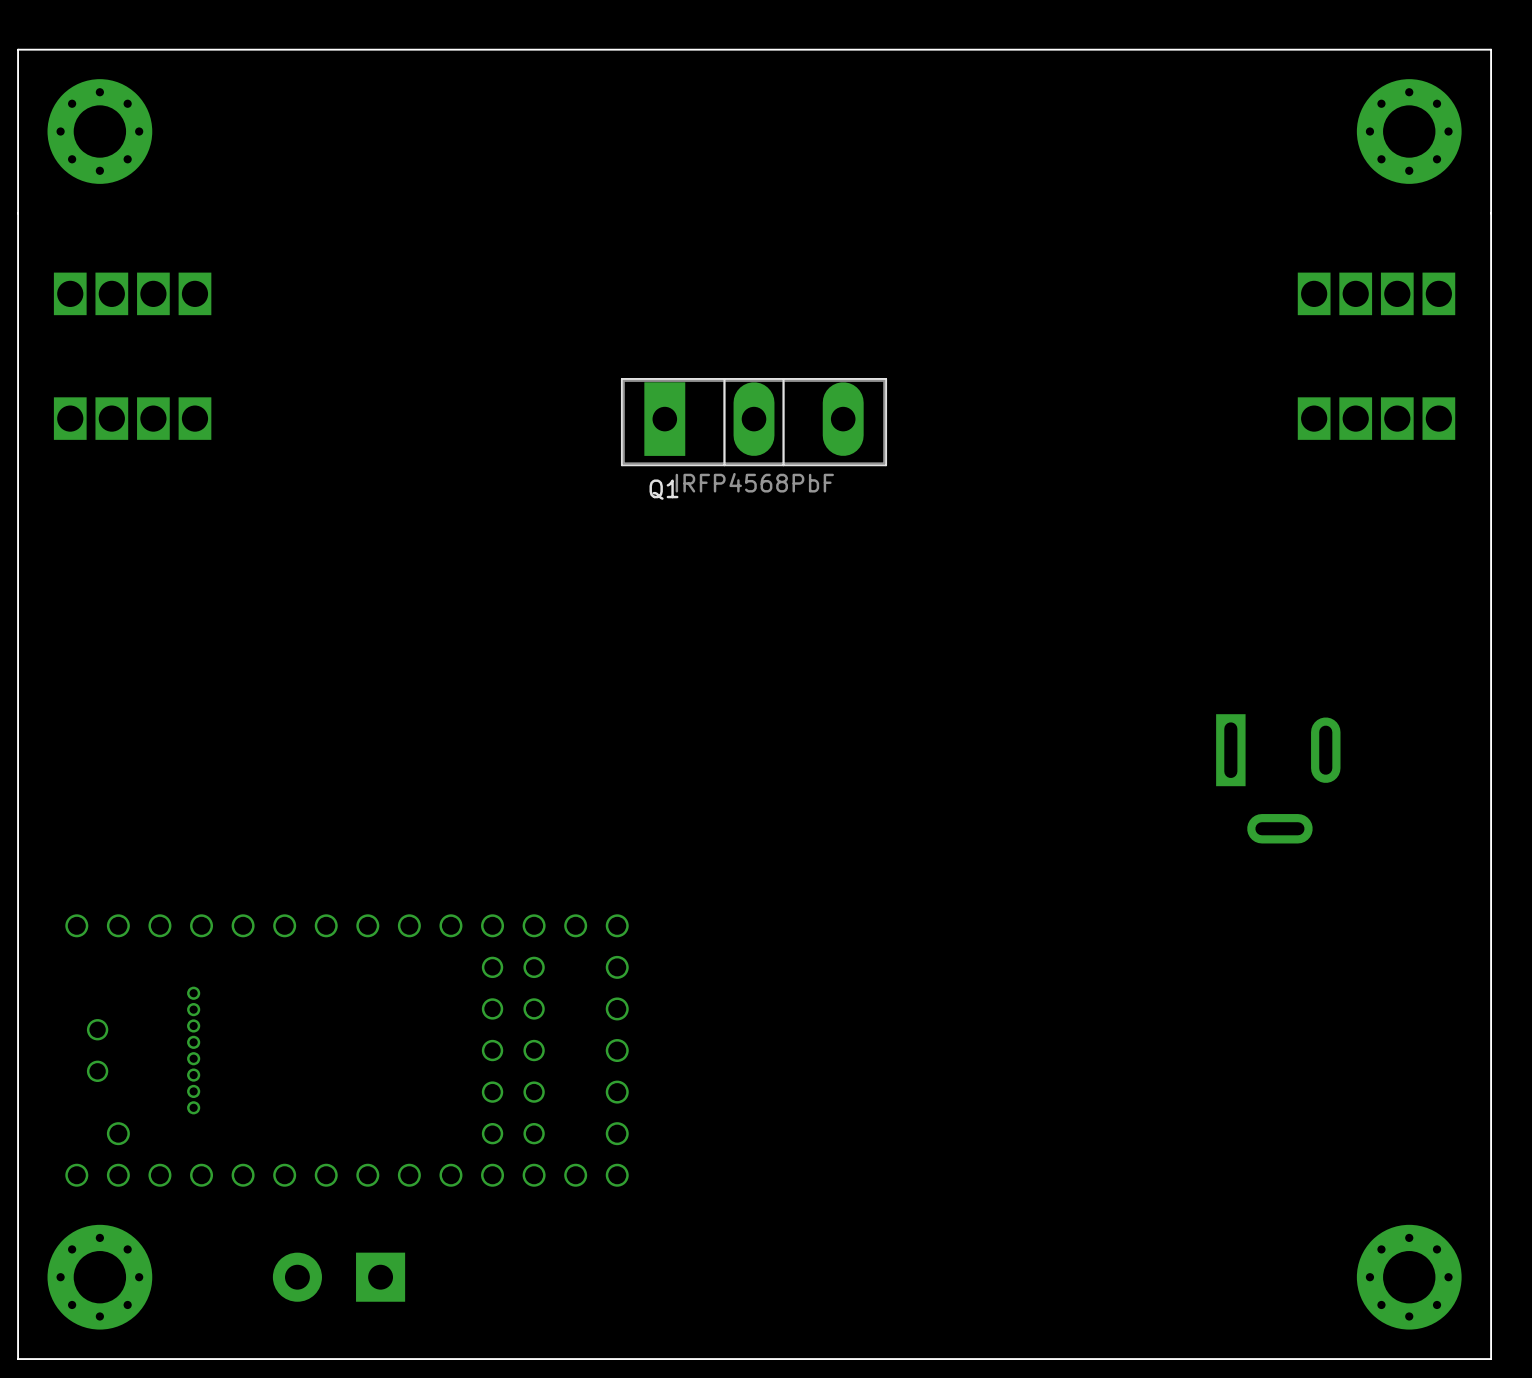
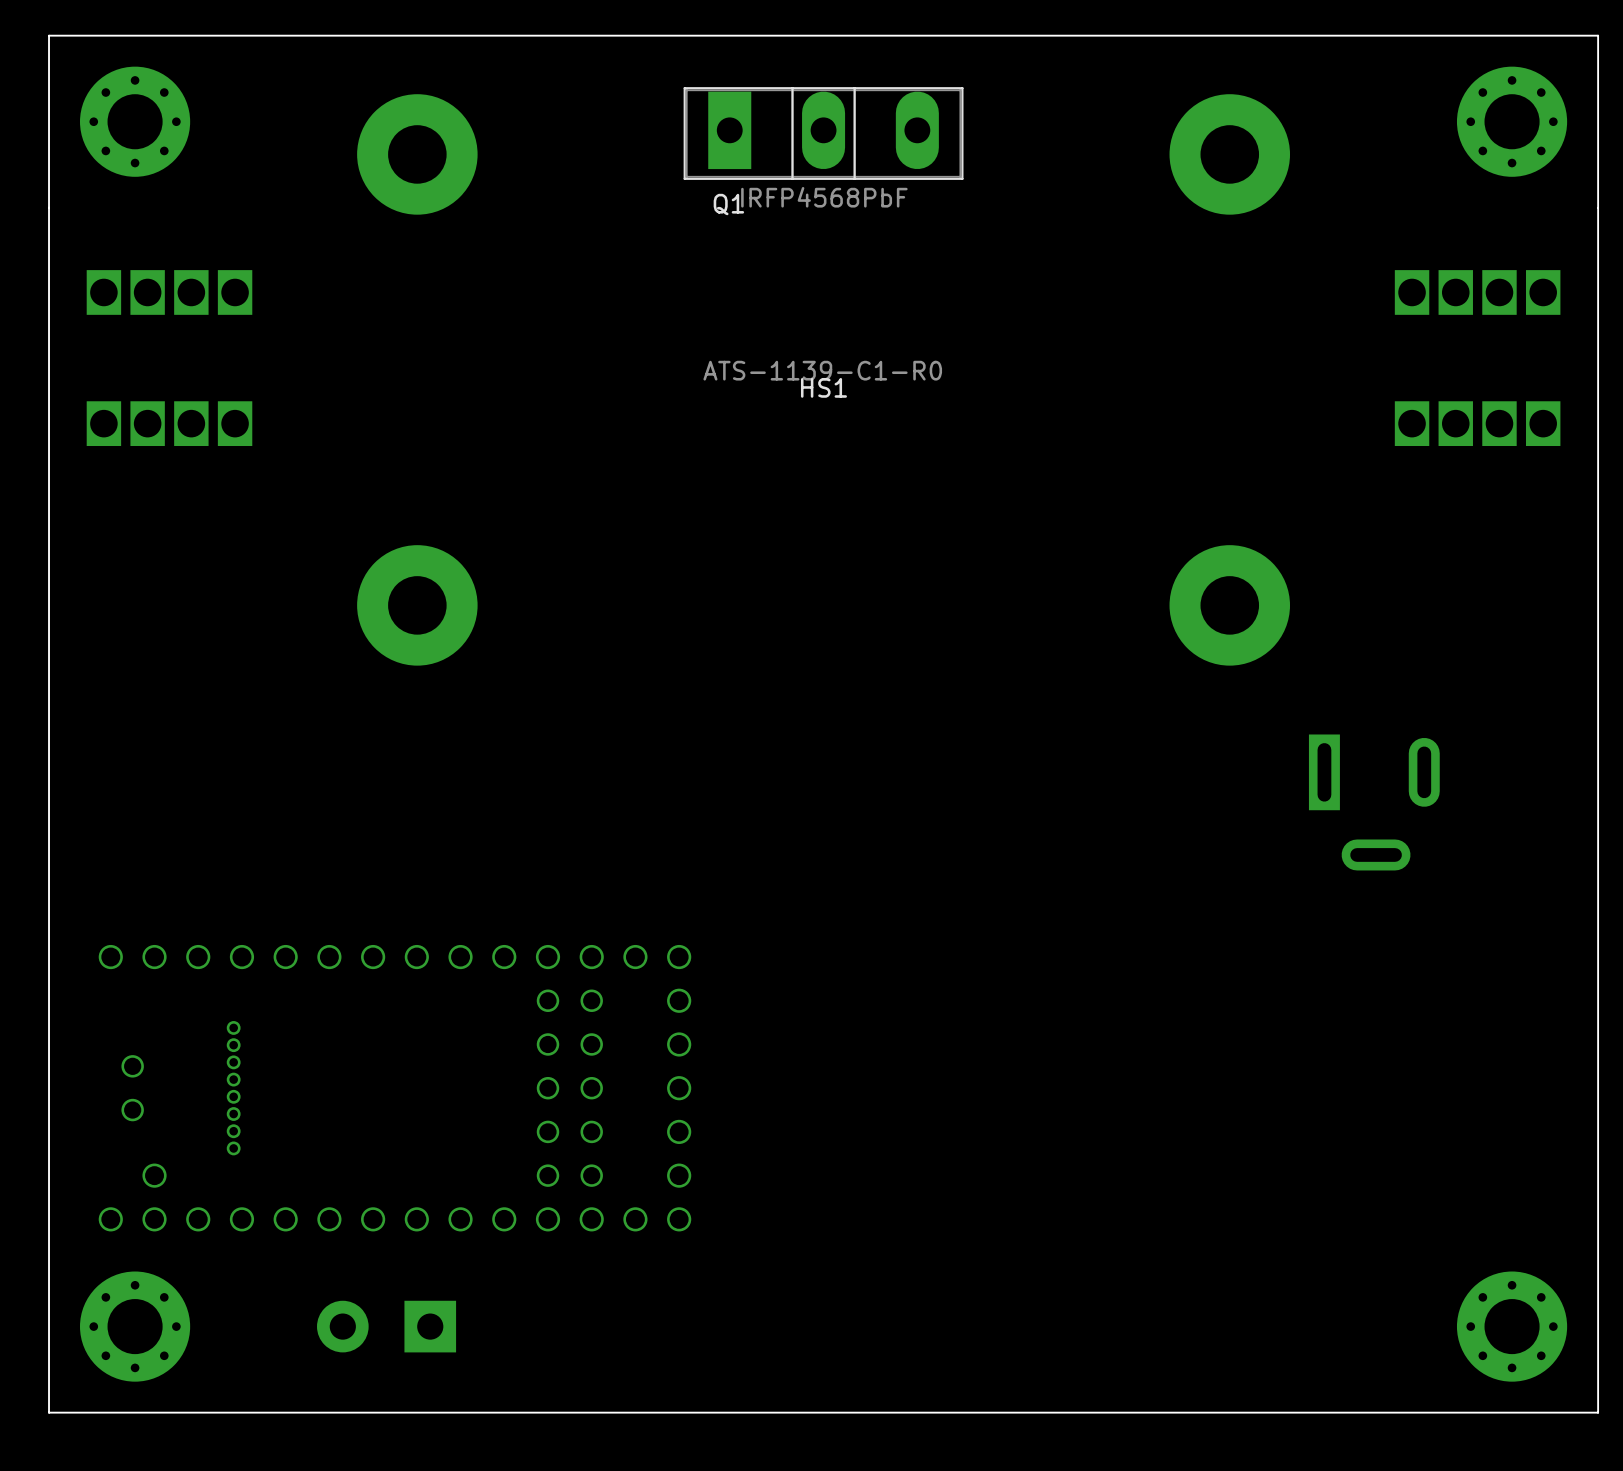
HS1: none -> ATS-1139-C1-R0 (823, 379)
Q1 position: (754, 422) -> (823, 133)

